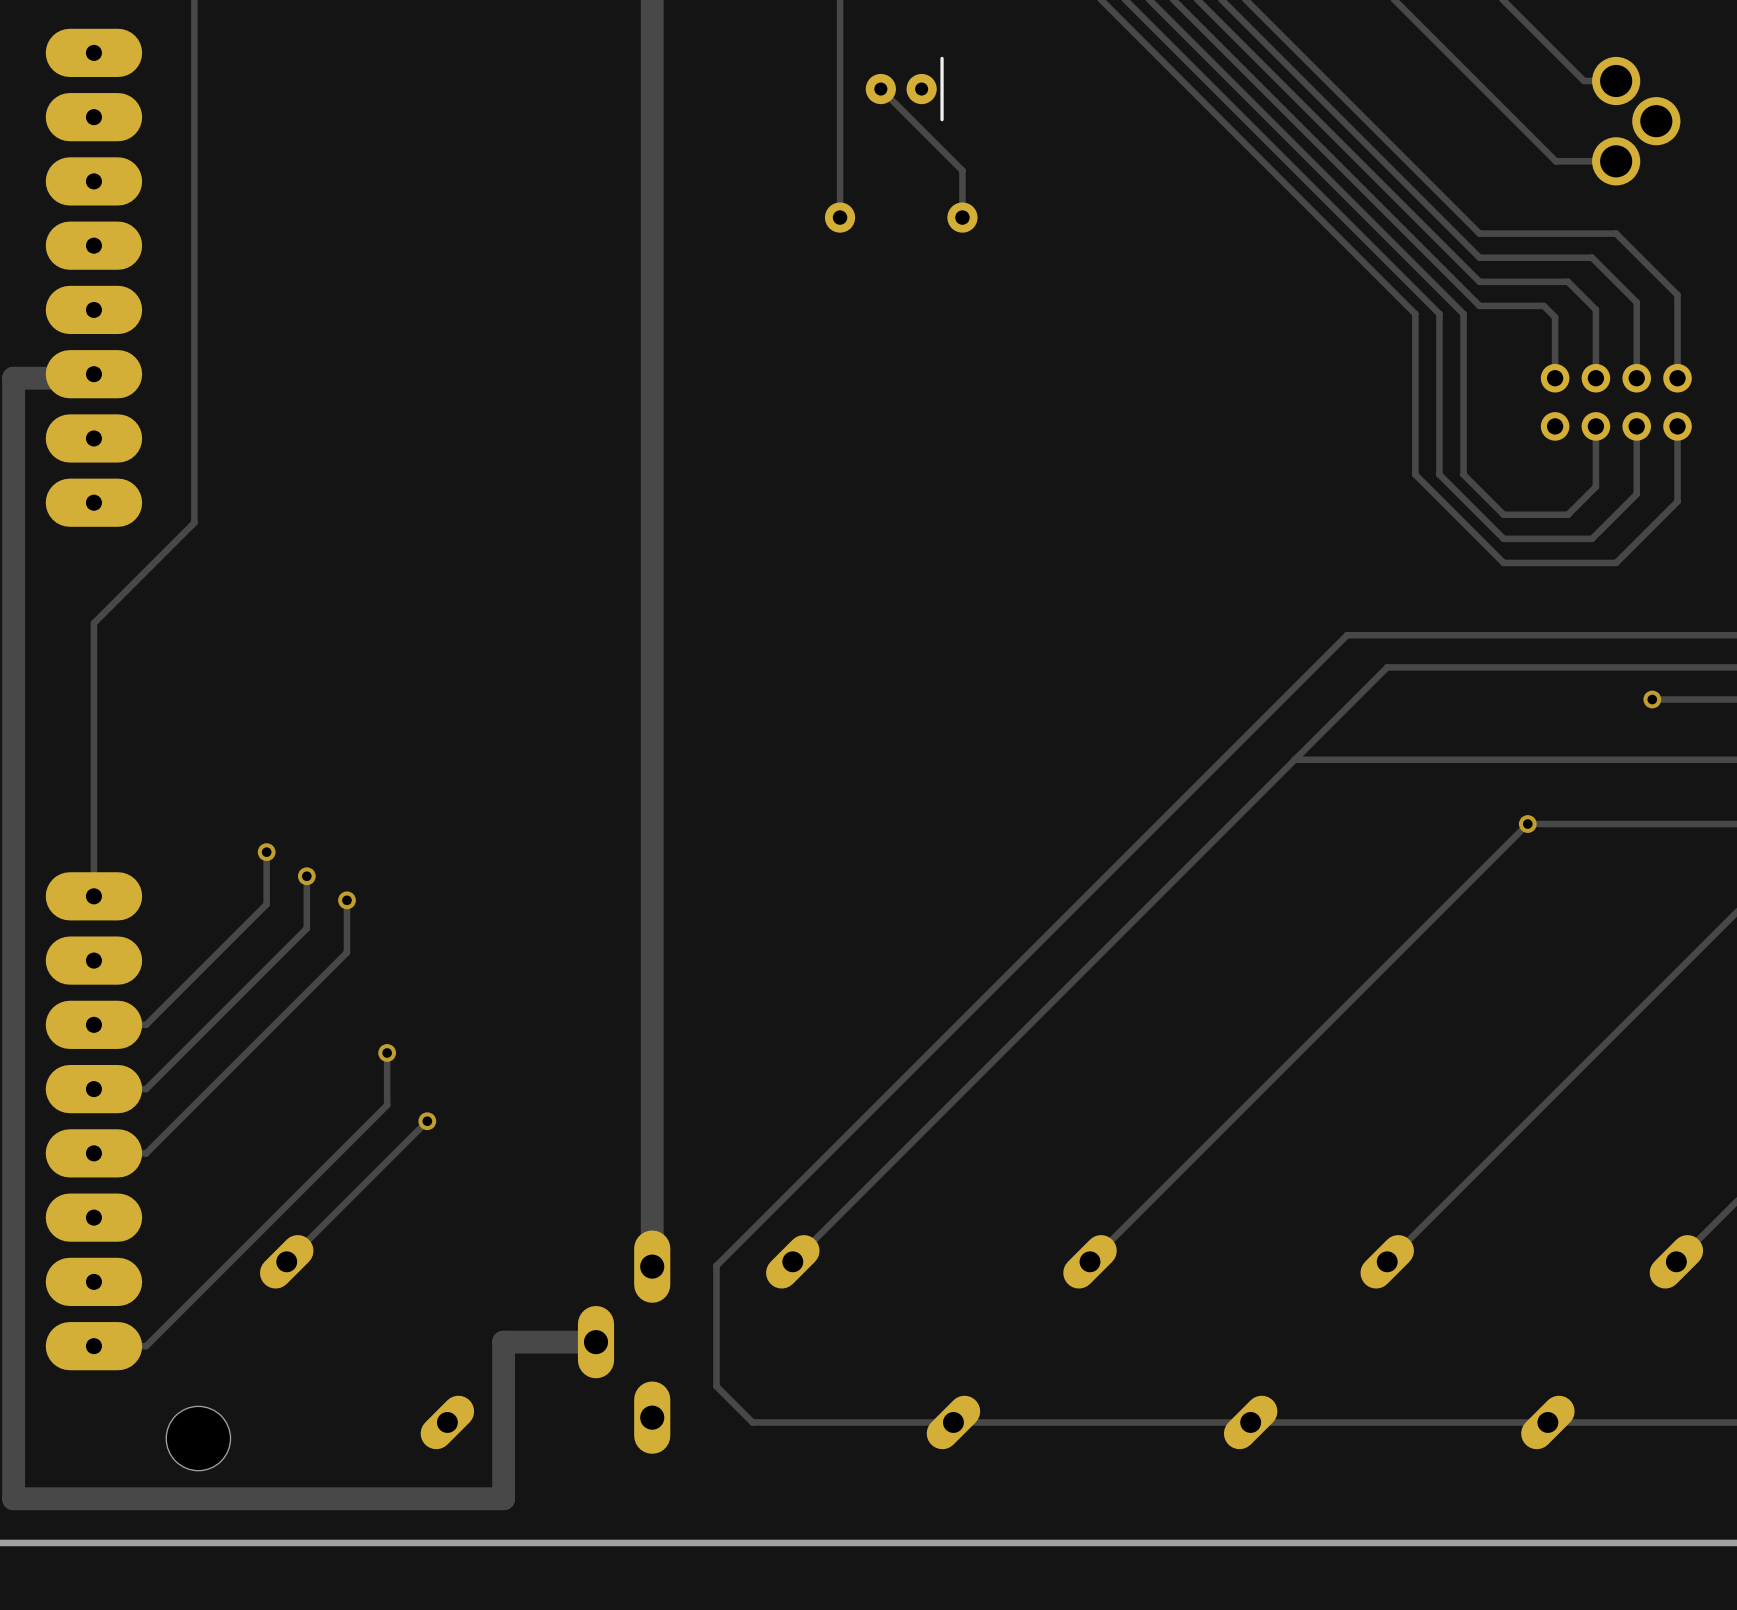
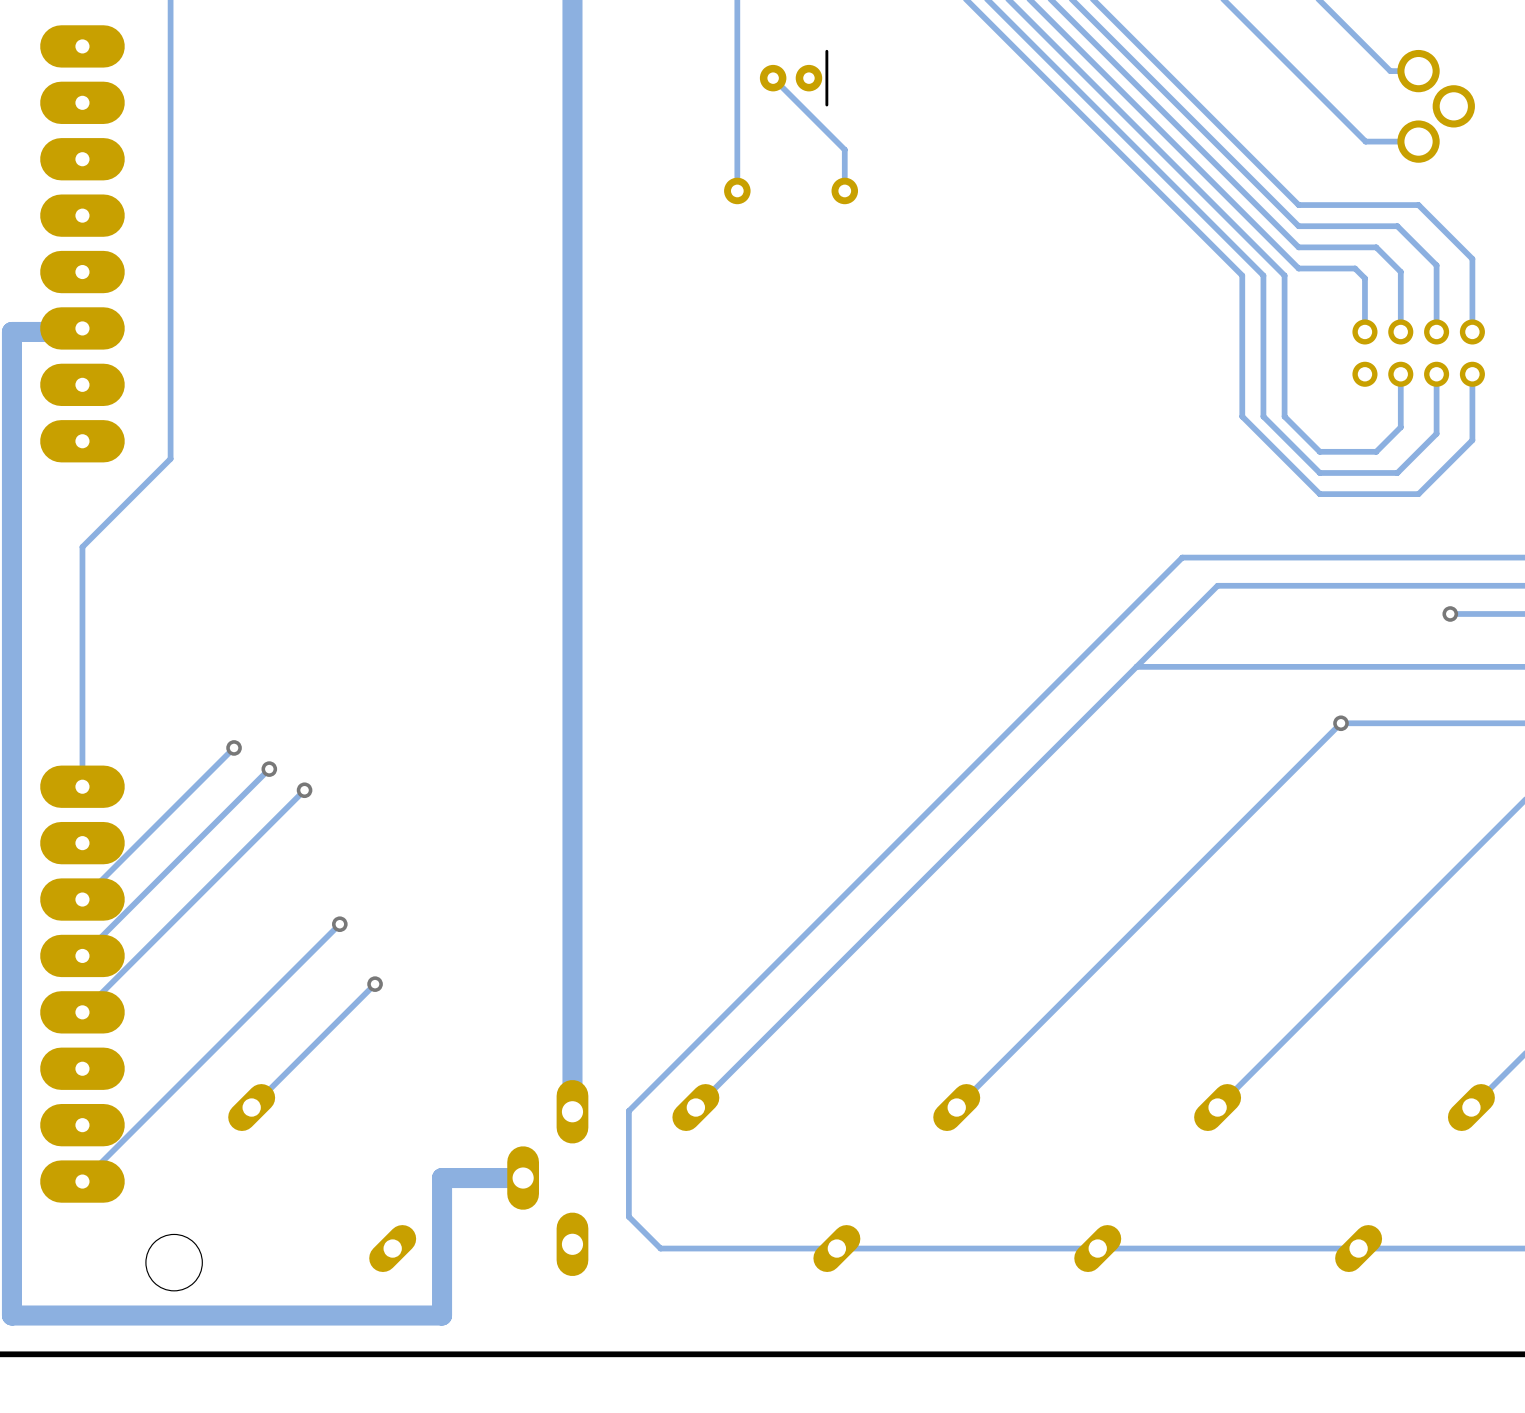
track: (266, 852) (266, 904) (146, 1024) (93, 1024) -> (234, 747) (82, 899)
track: (306, 876) (306, 928) (146, 1089) (93, 1089) -> (269, 769) (82, 955)
track: (346, 900) (346, 952) (146, 1153) (93, 1153) -> (304, 790) (82, 1012)
track: (387, 1052) (387, 1105) (146, 1346) (93, 1346) -> (339, 924) (82, 1181)

